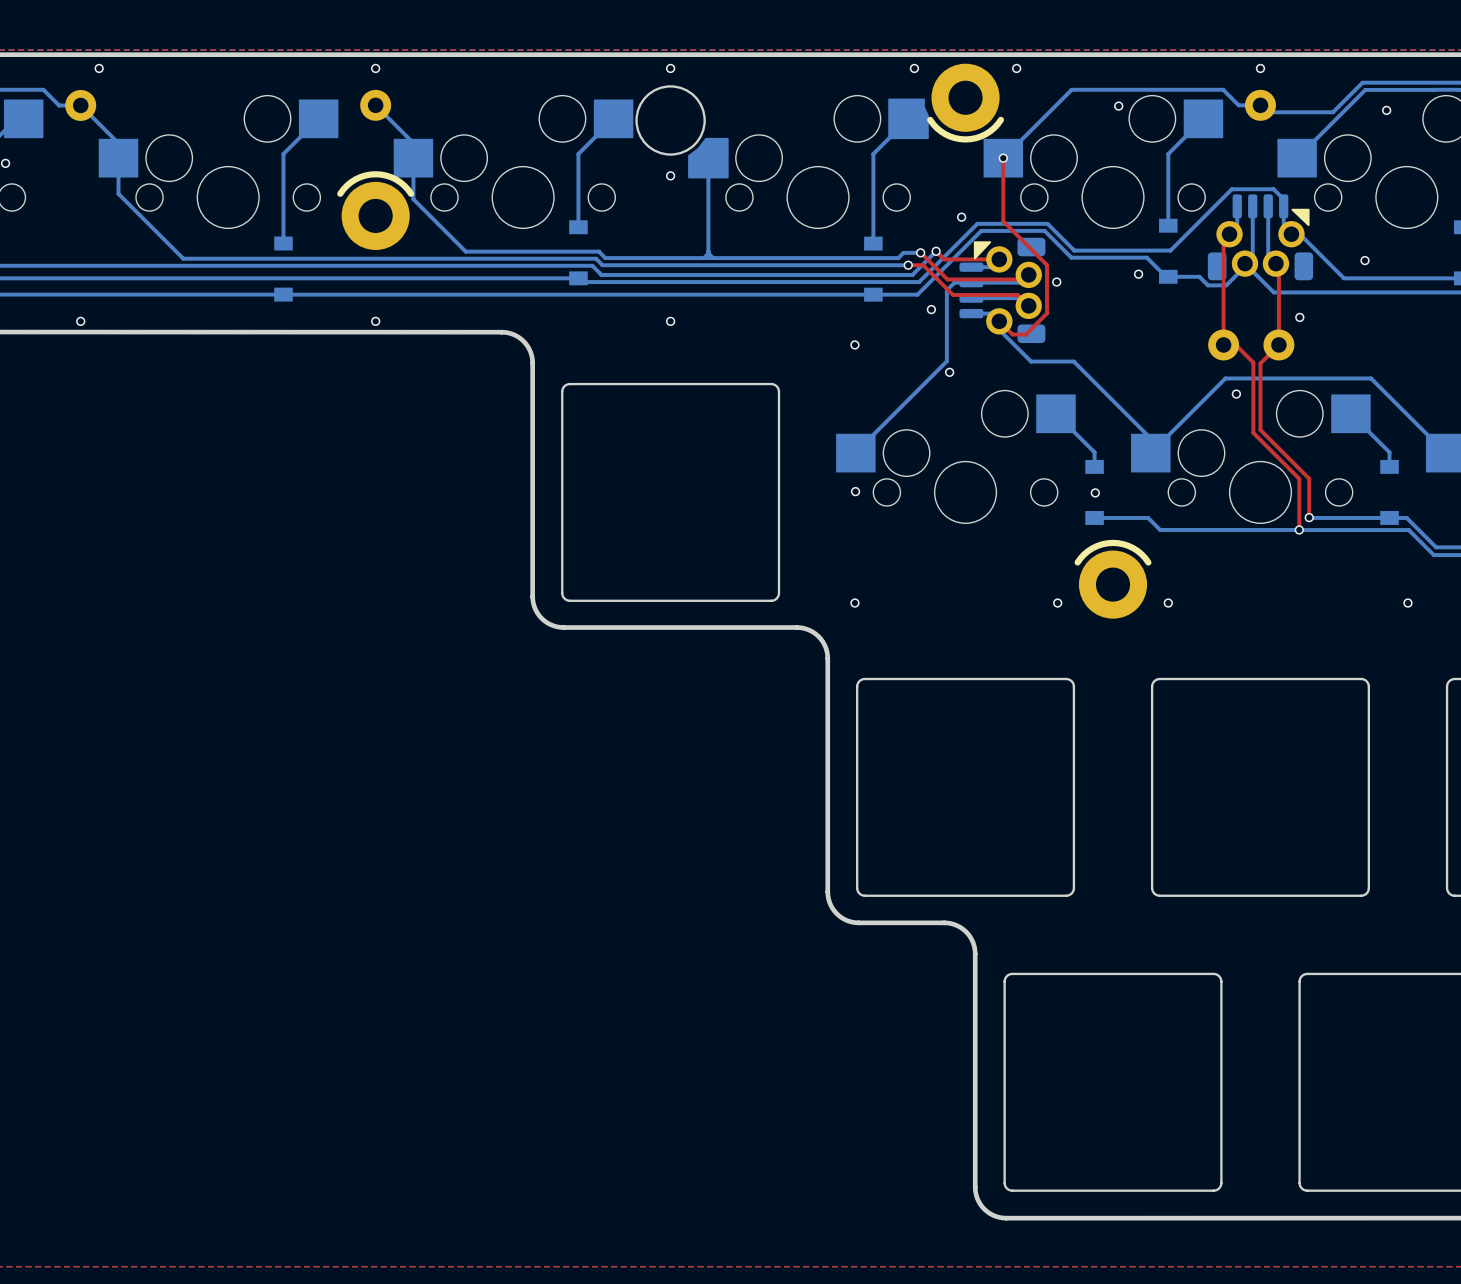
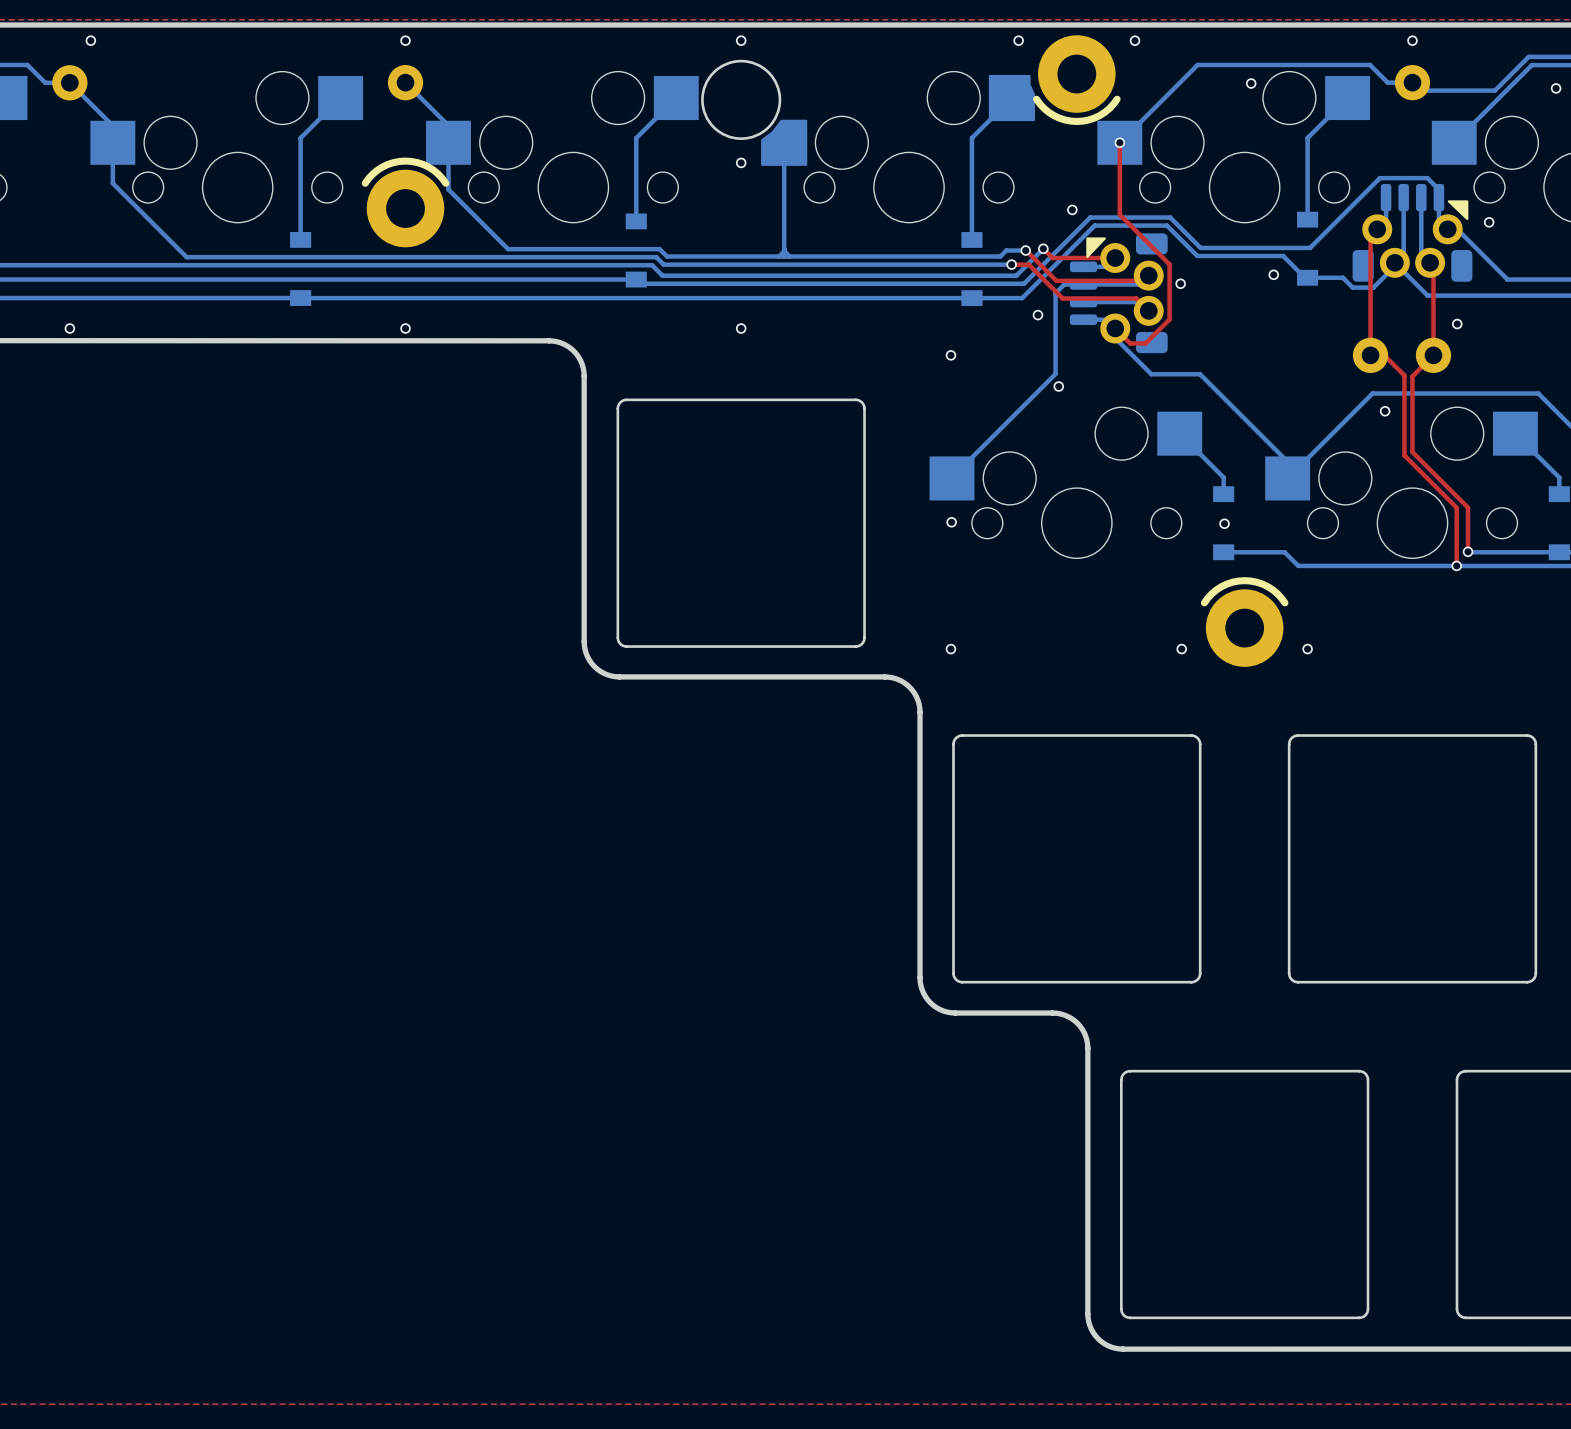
via position: (1364, 260) -> (1489, 222)

